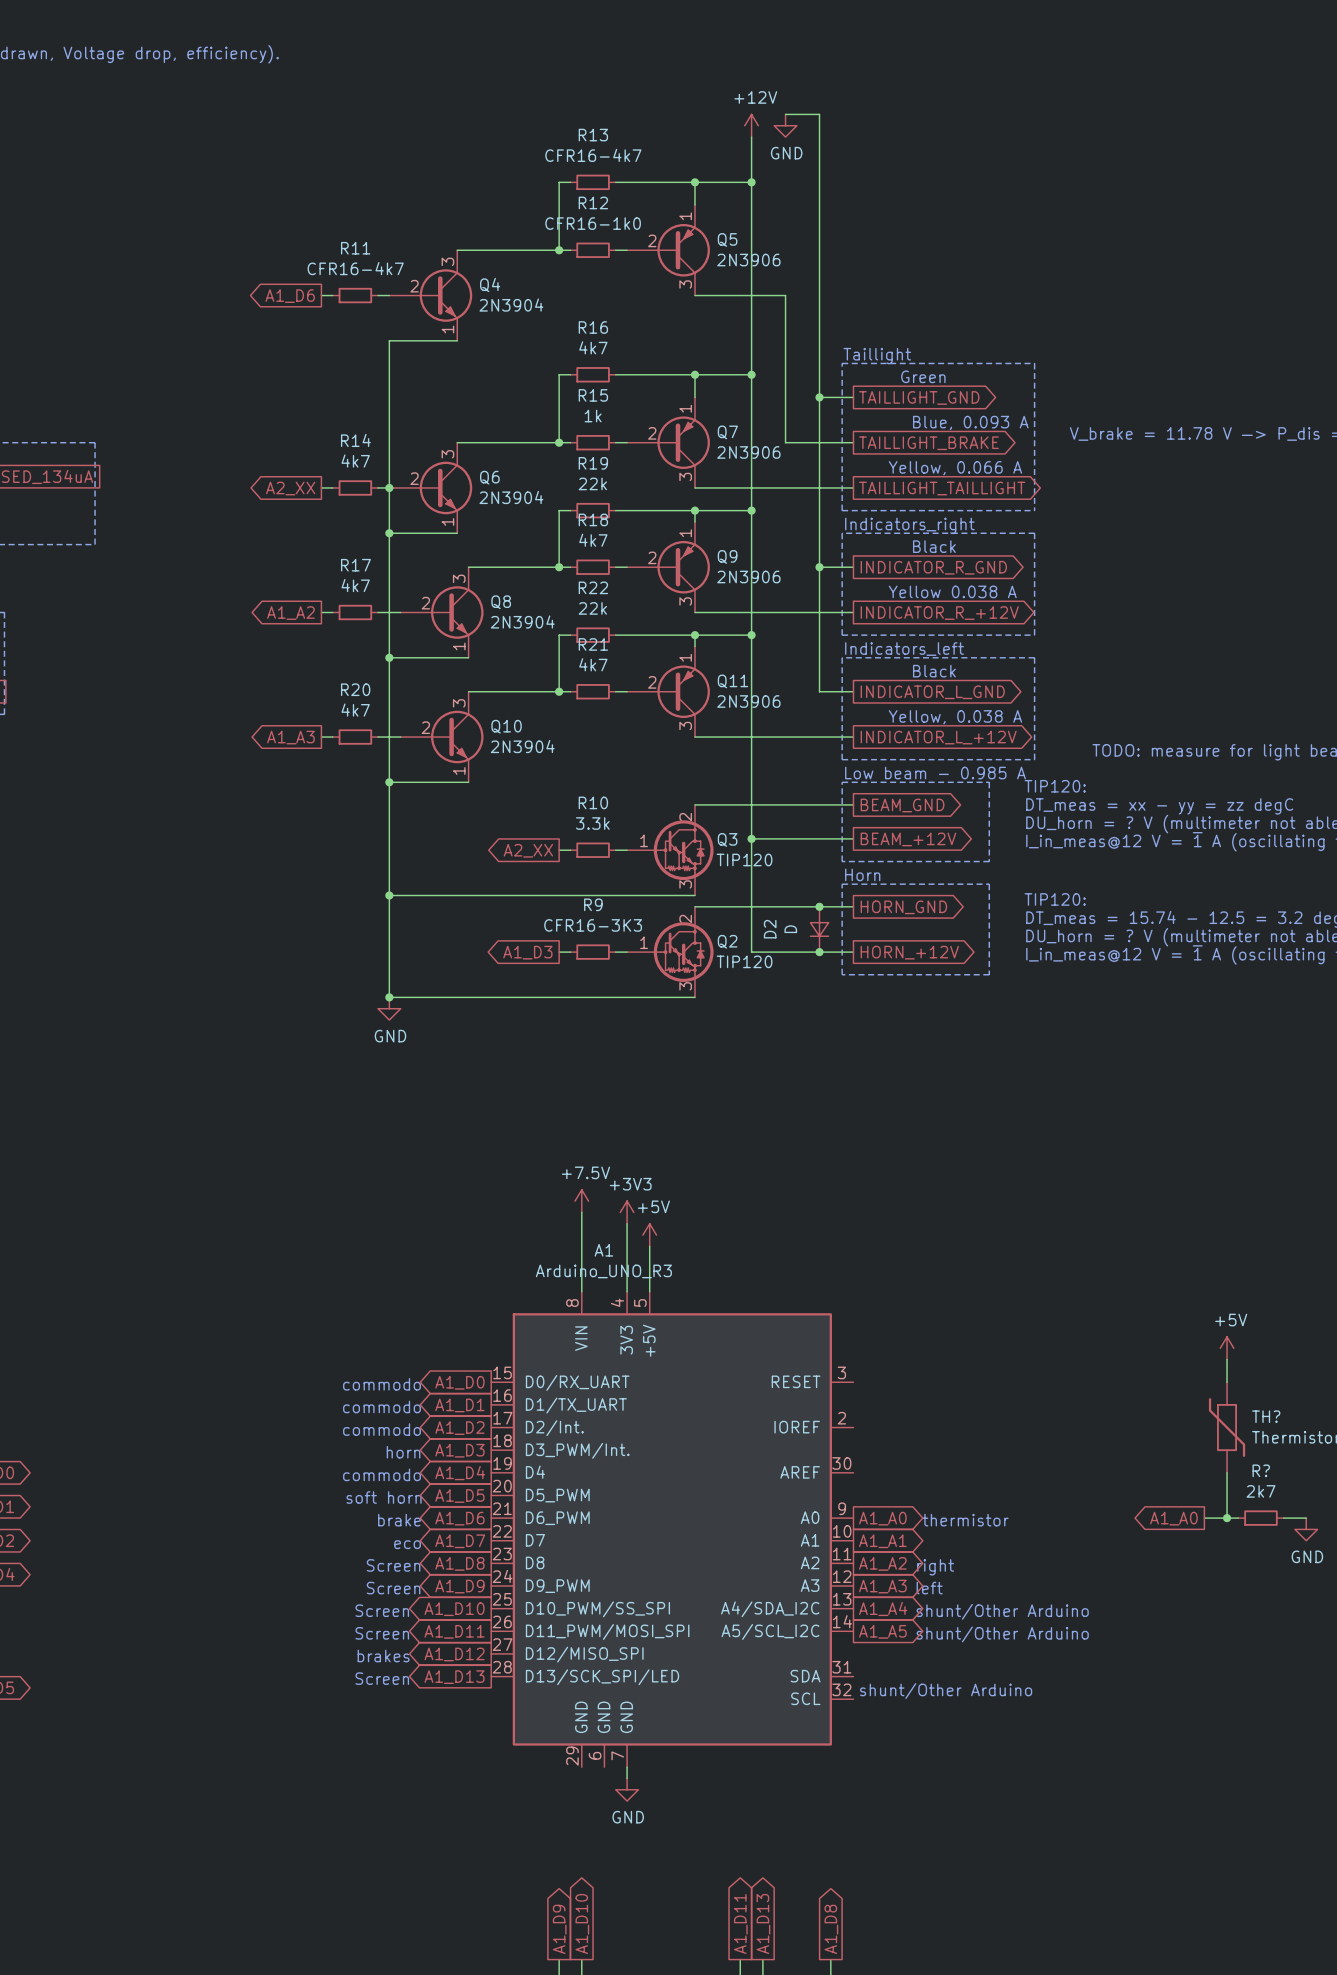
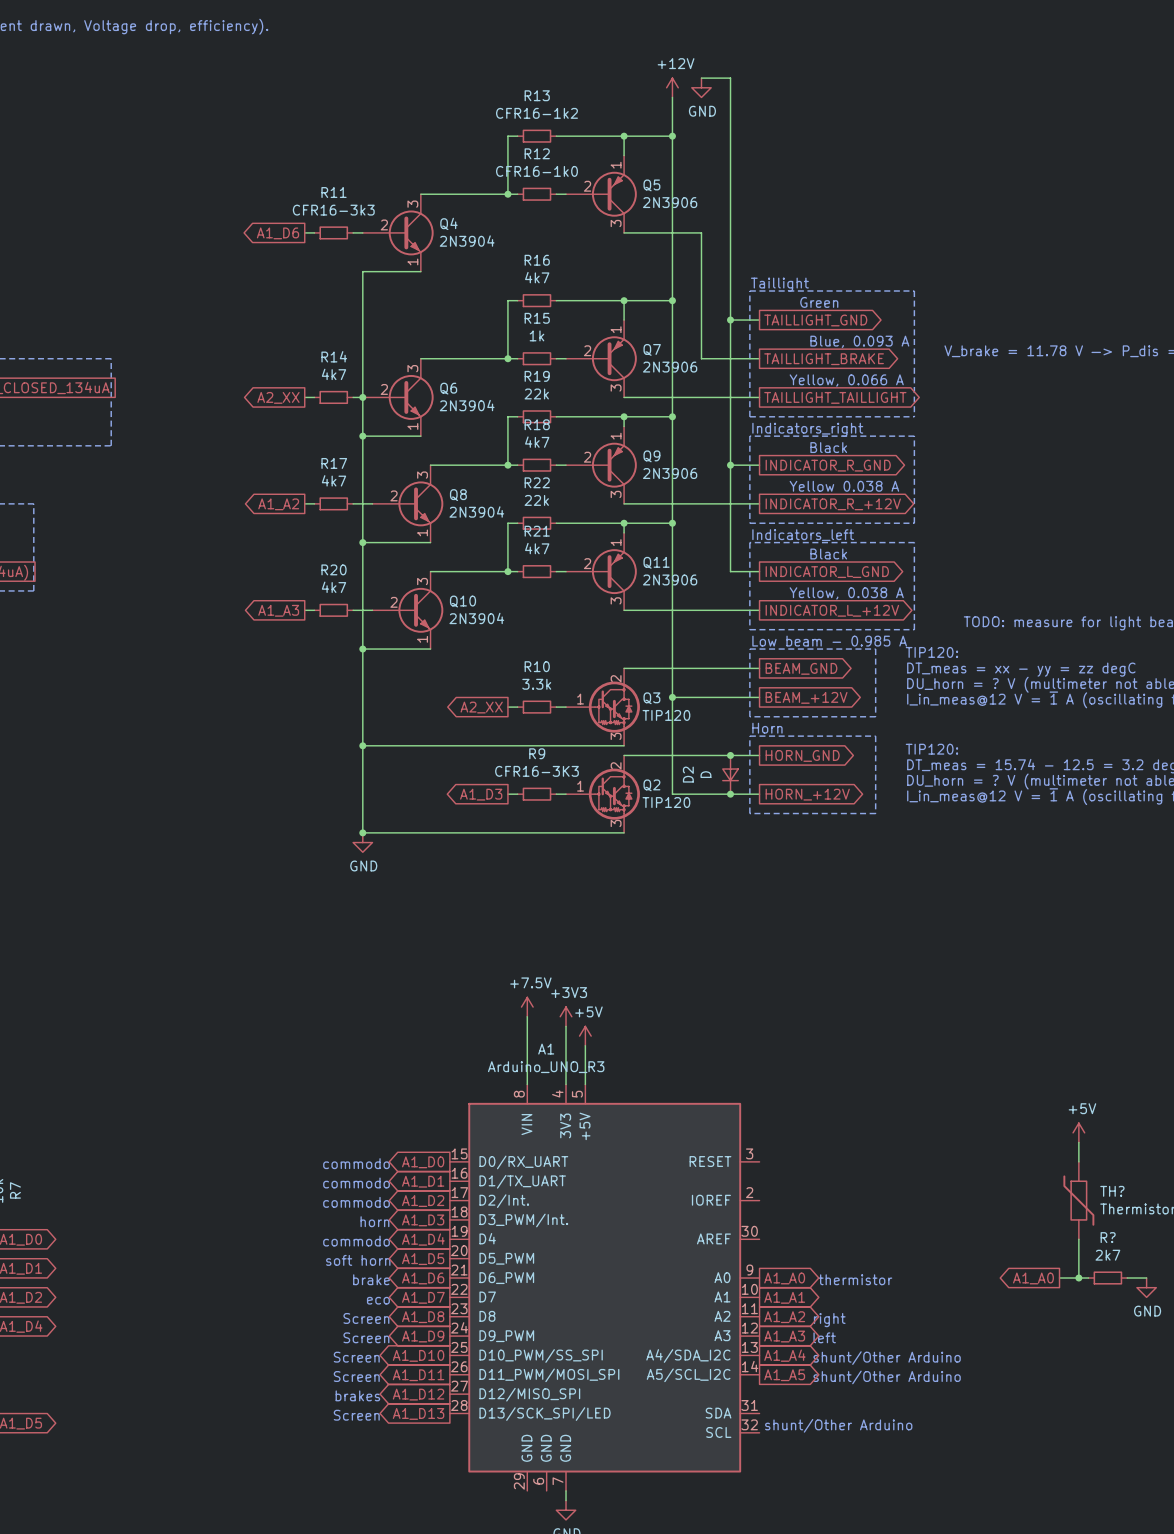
R13 value: CFR16-4k7 (593, 155) -> CFR16-1k2 (536, 113)
R11 value: CFR16-4k7 (355, 268) -> CFR16-3k3 (333, 210)

